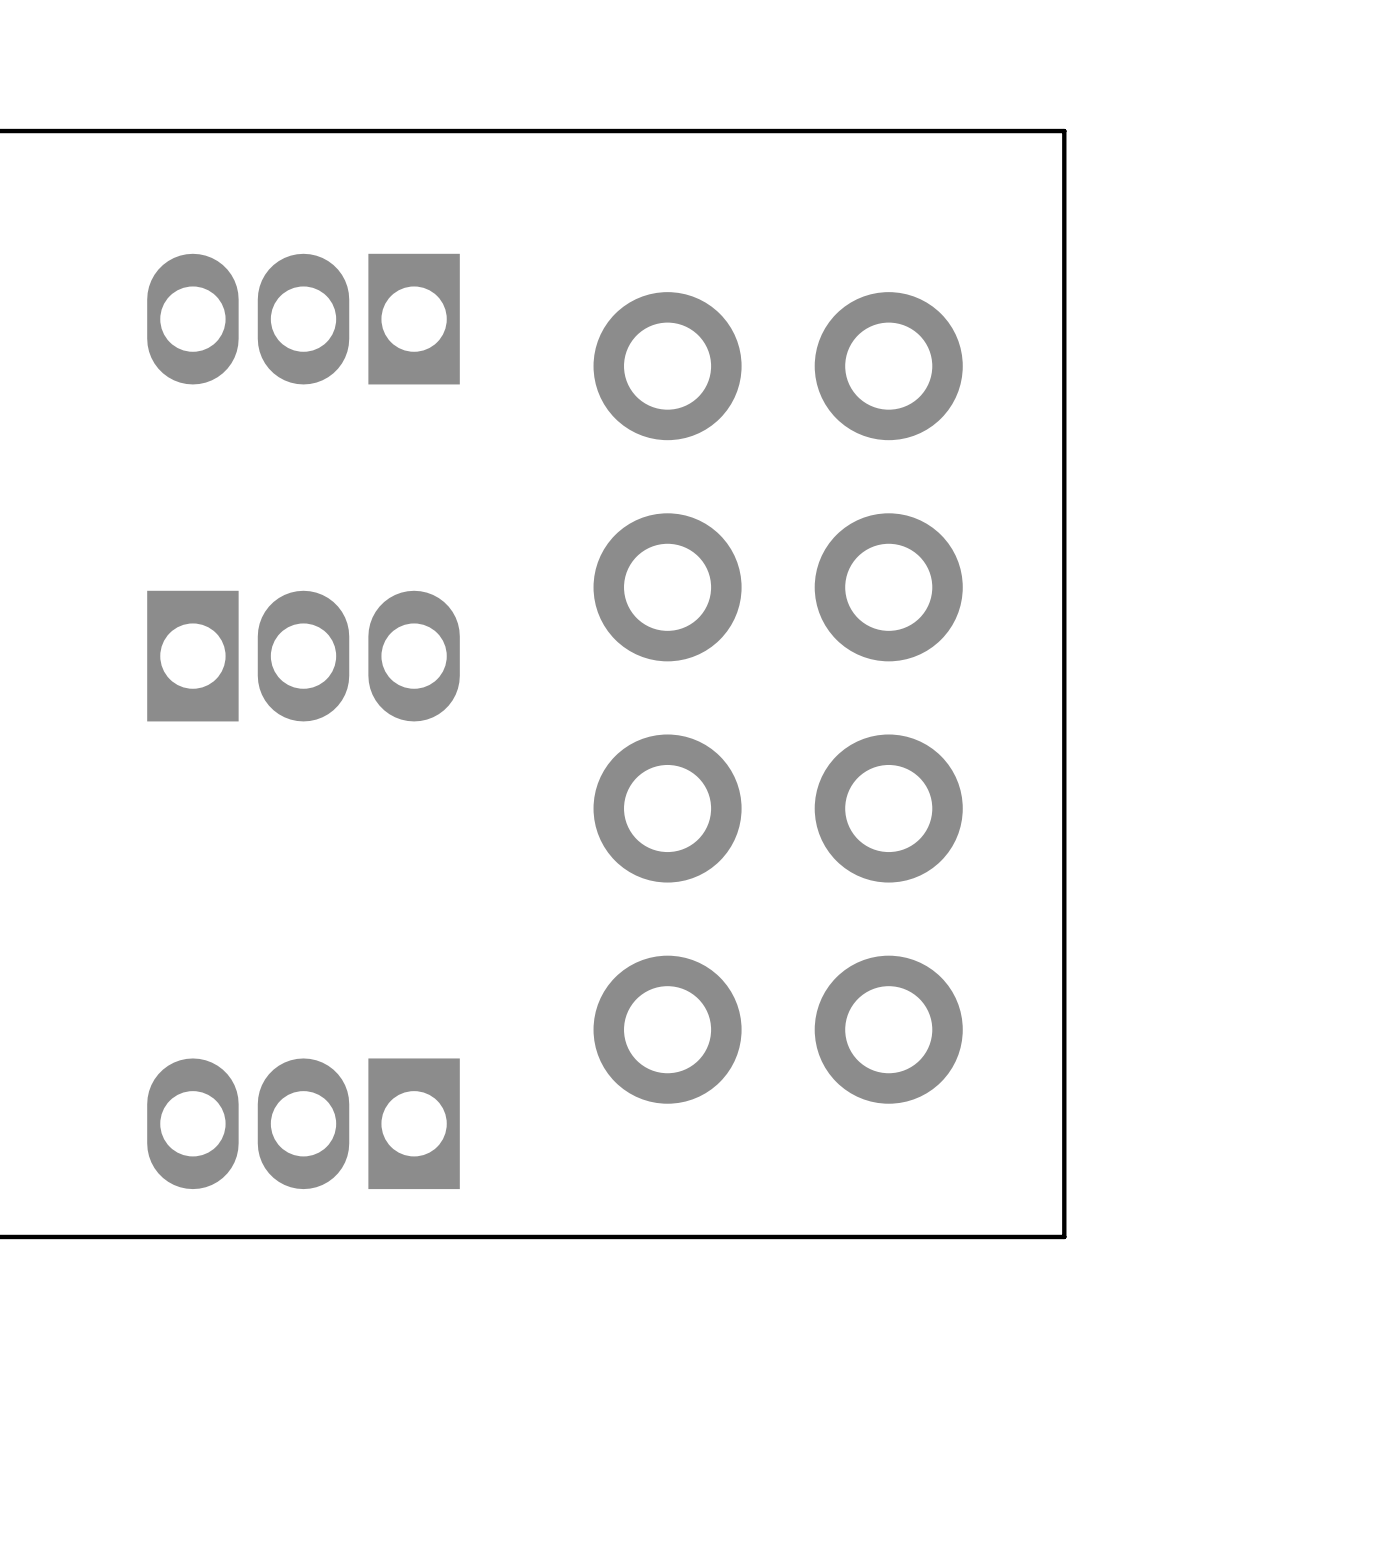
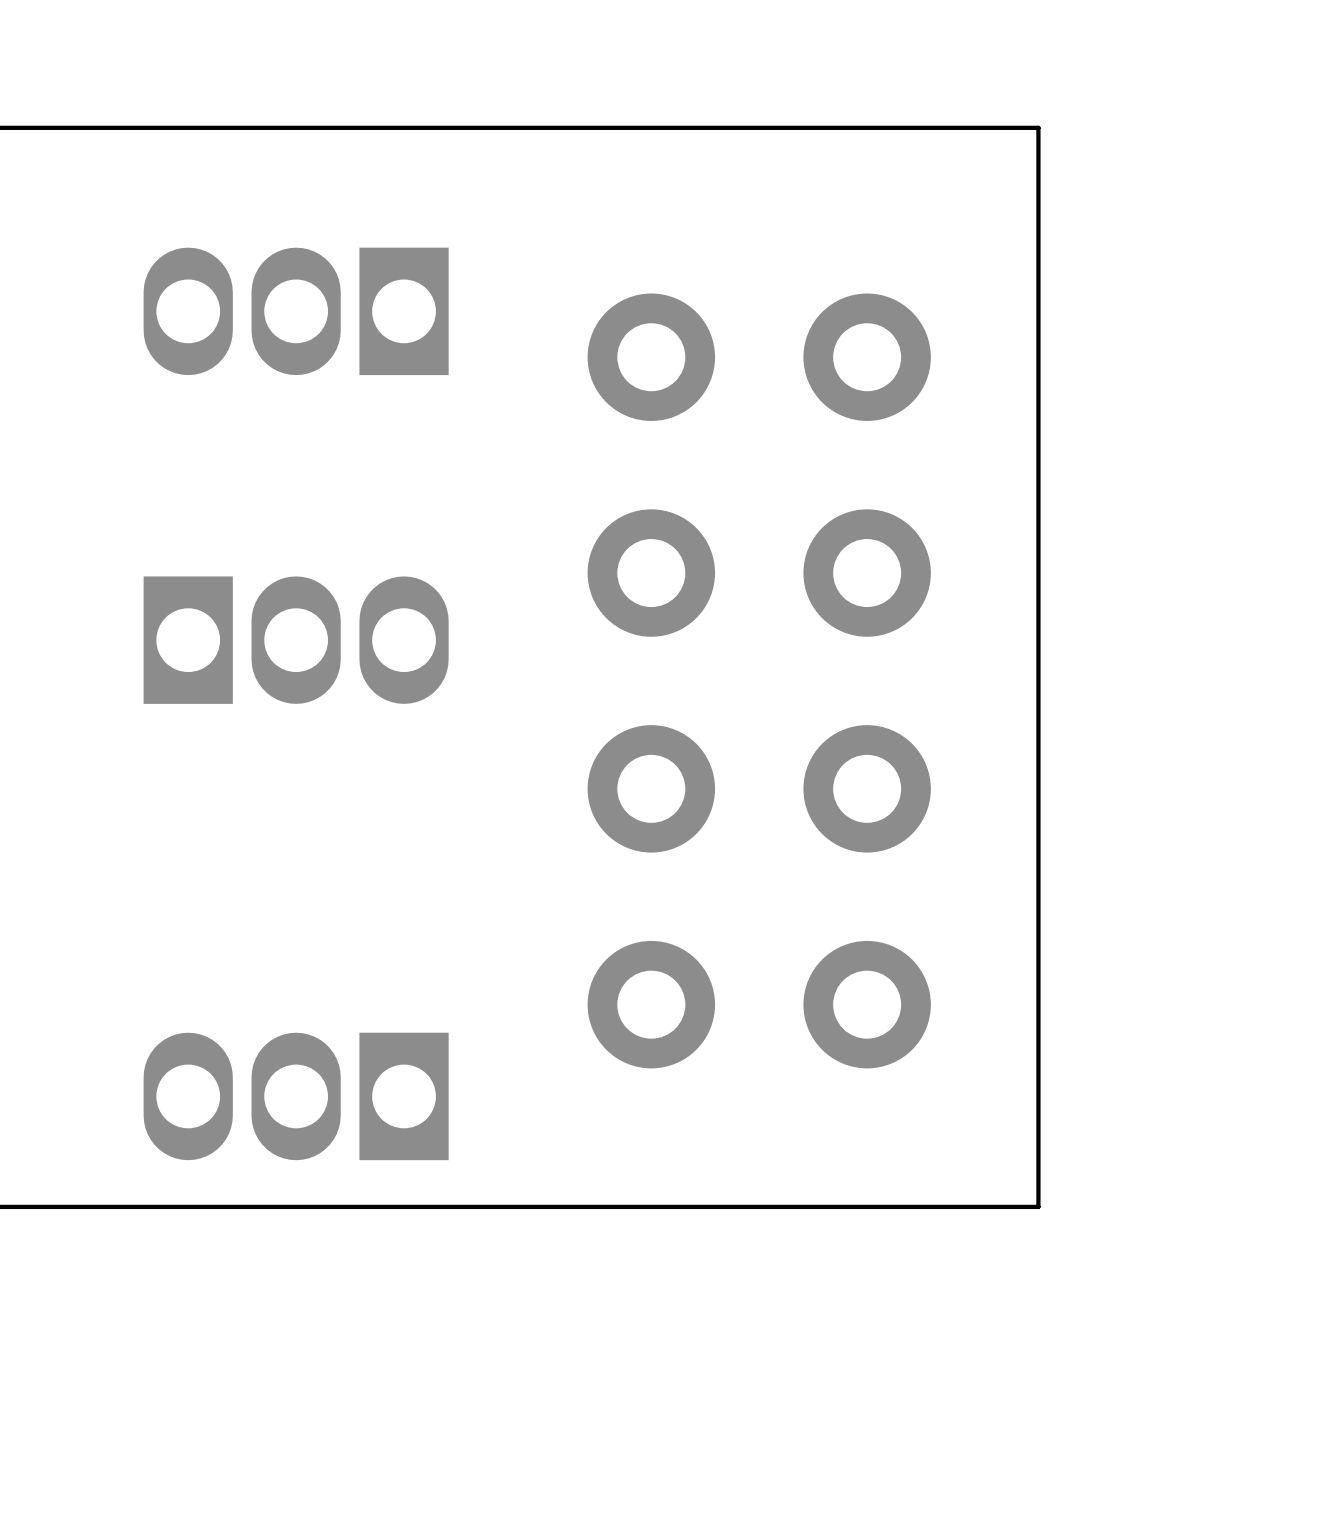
part footprint: [593, 292, 963, 1104] -> [587, 293, 931, 1069]

